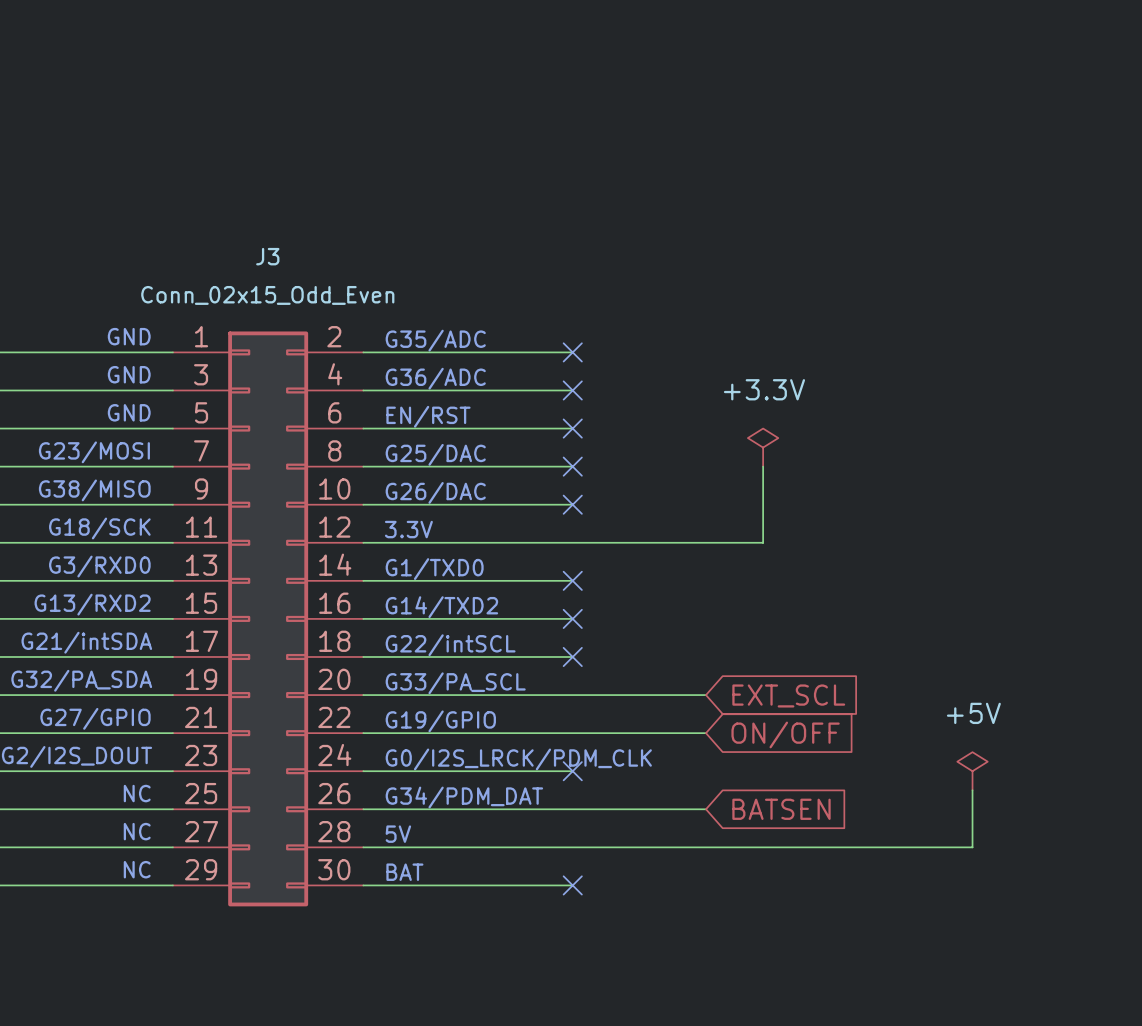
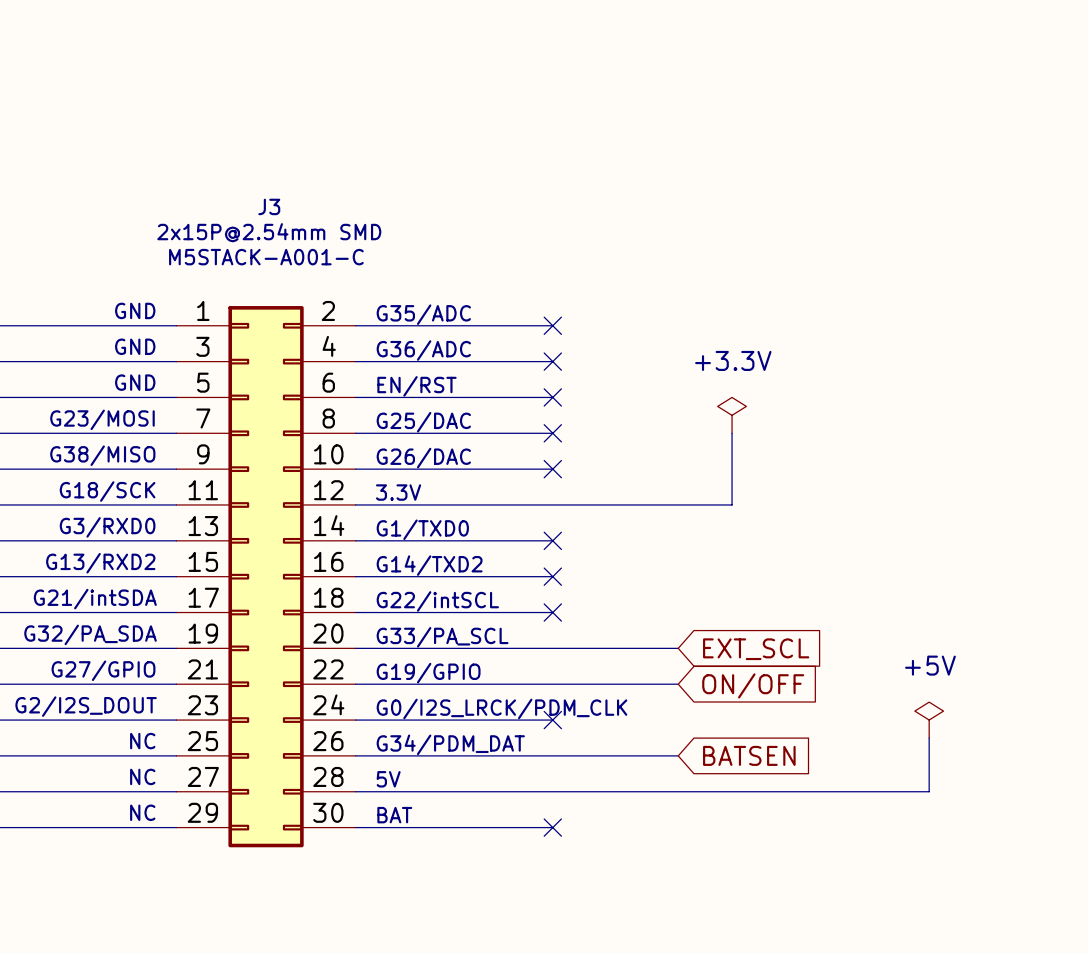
J3 name position: J3 (267, 256) -> J3 (269, 206)
J3 text: none -> M5STACK-A001-C (266, 257)
J3 value: Conn_02x15_Odd_Even (267, 295) -> 2x15P@2.54mm SMD (269, 232)

